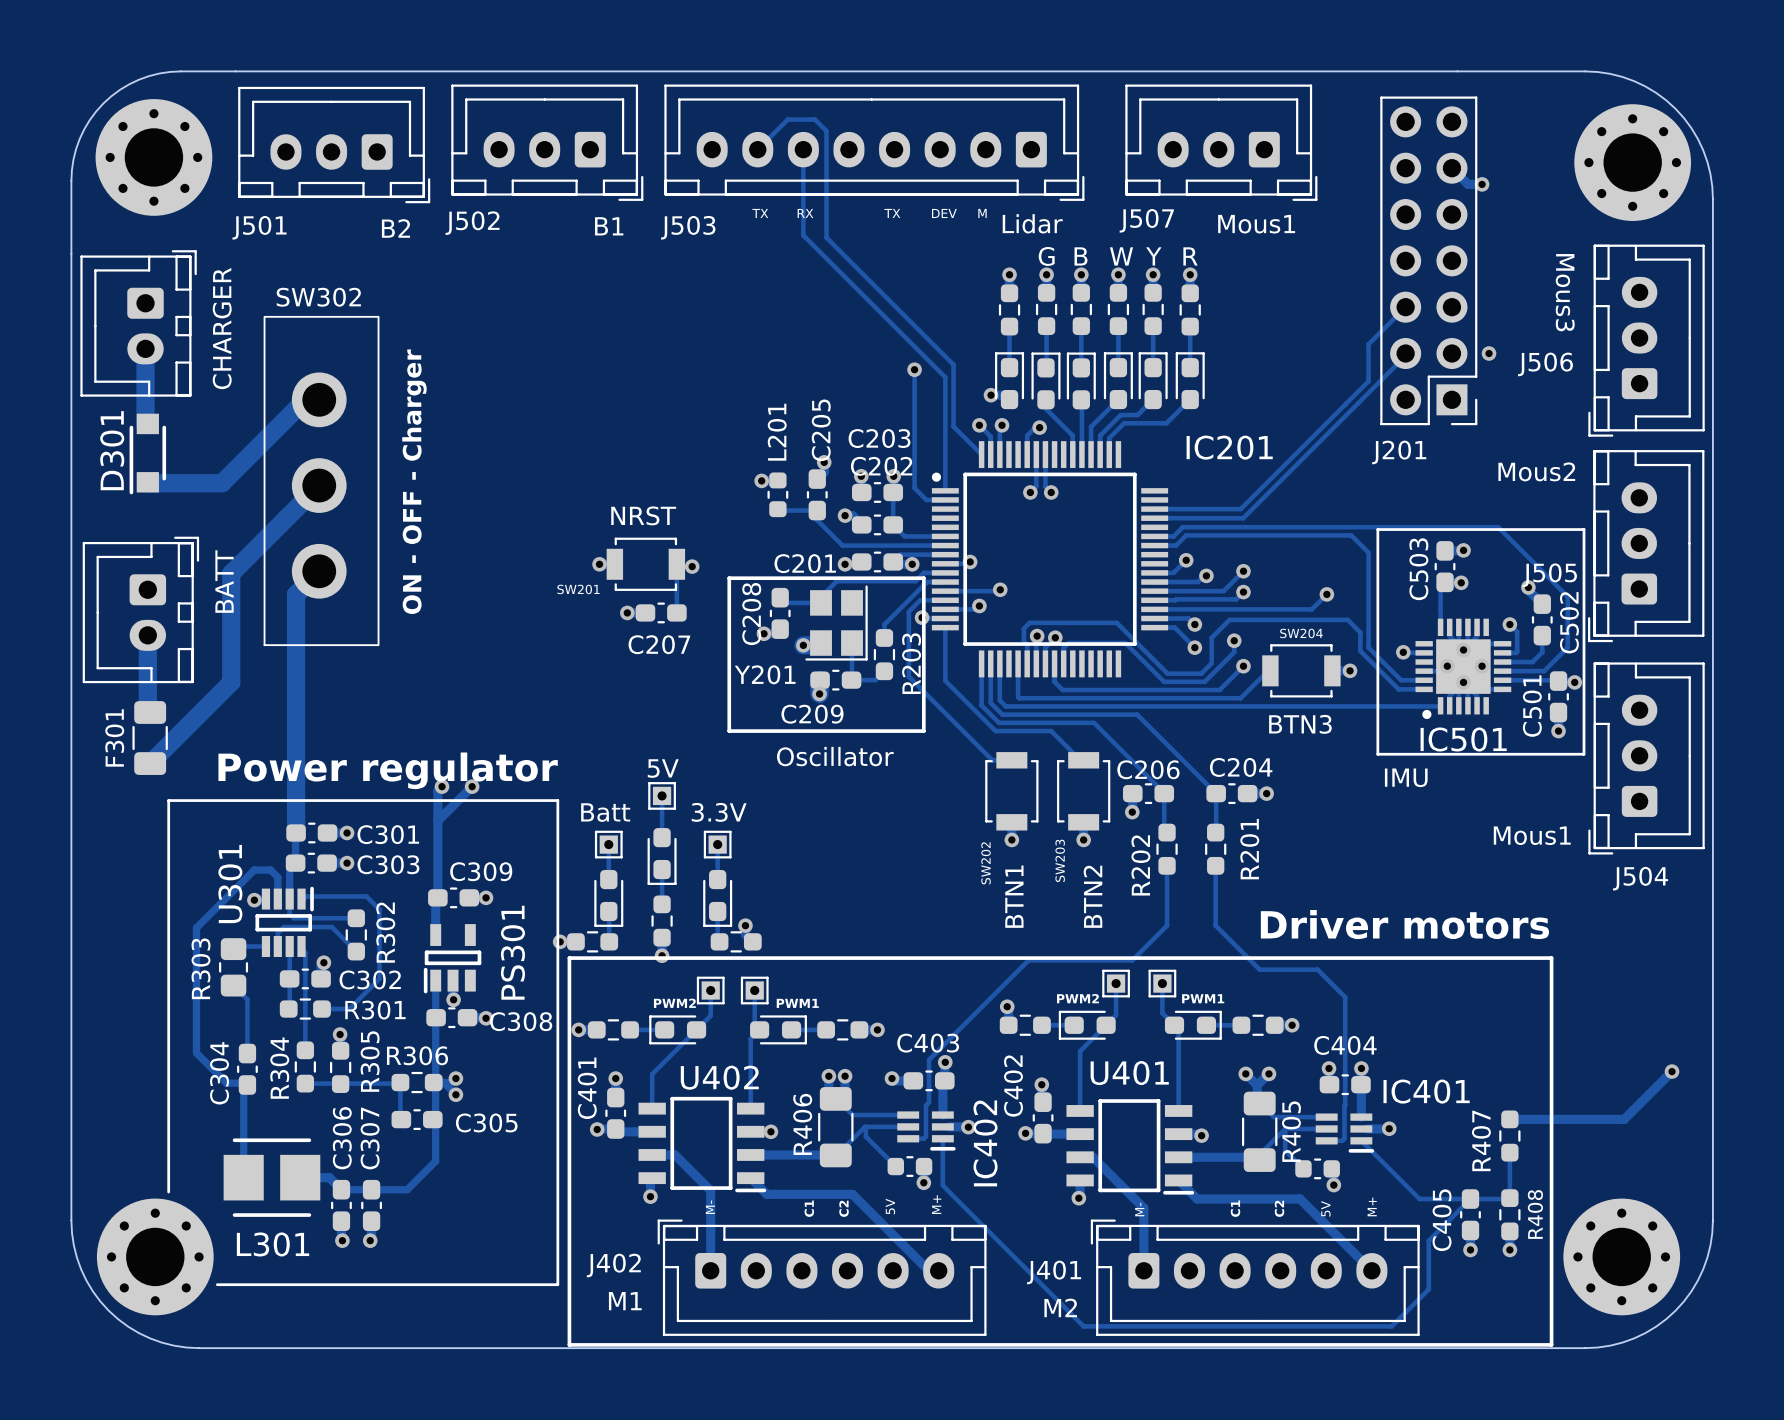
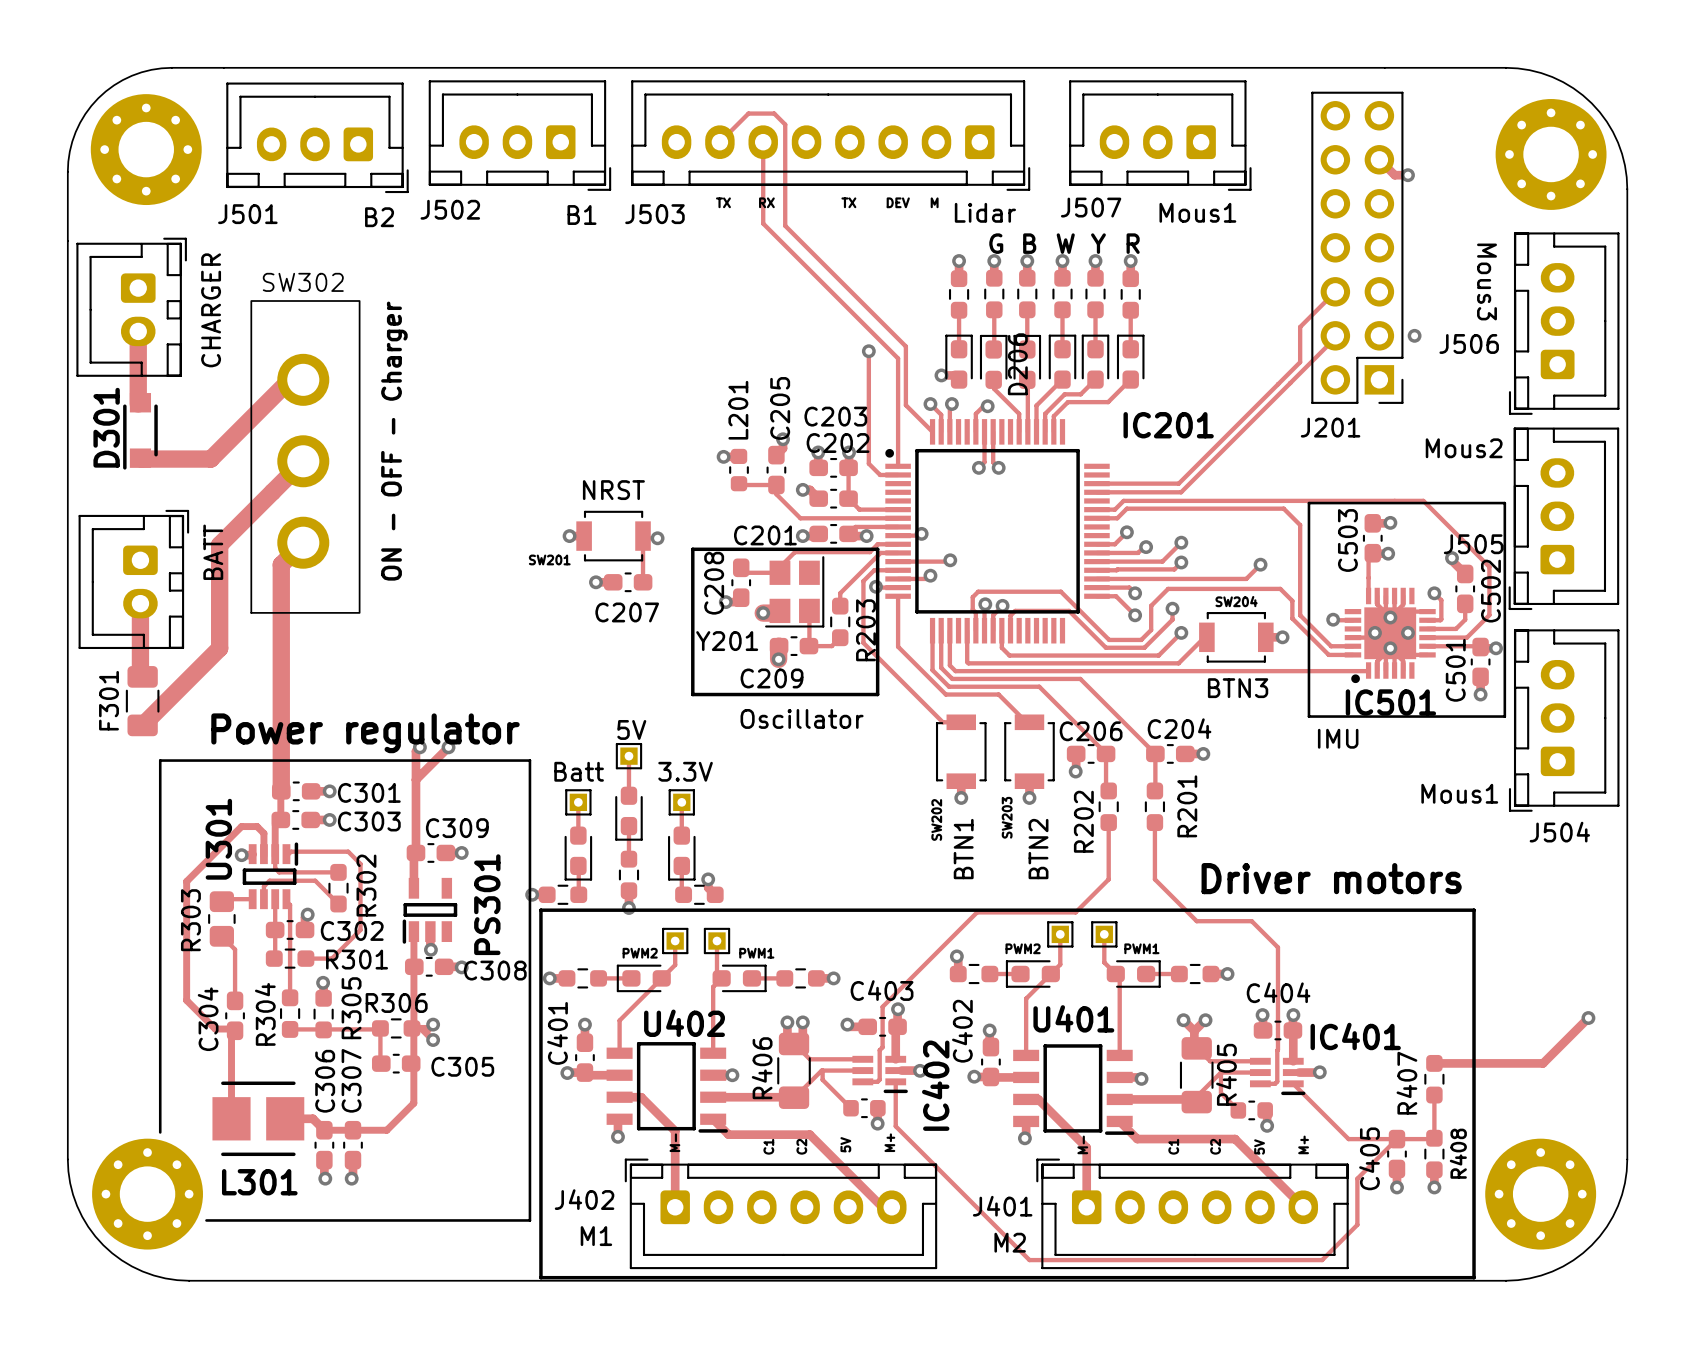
D206 name: none -> D206 (1017, 364)

